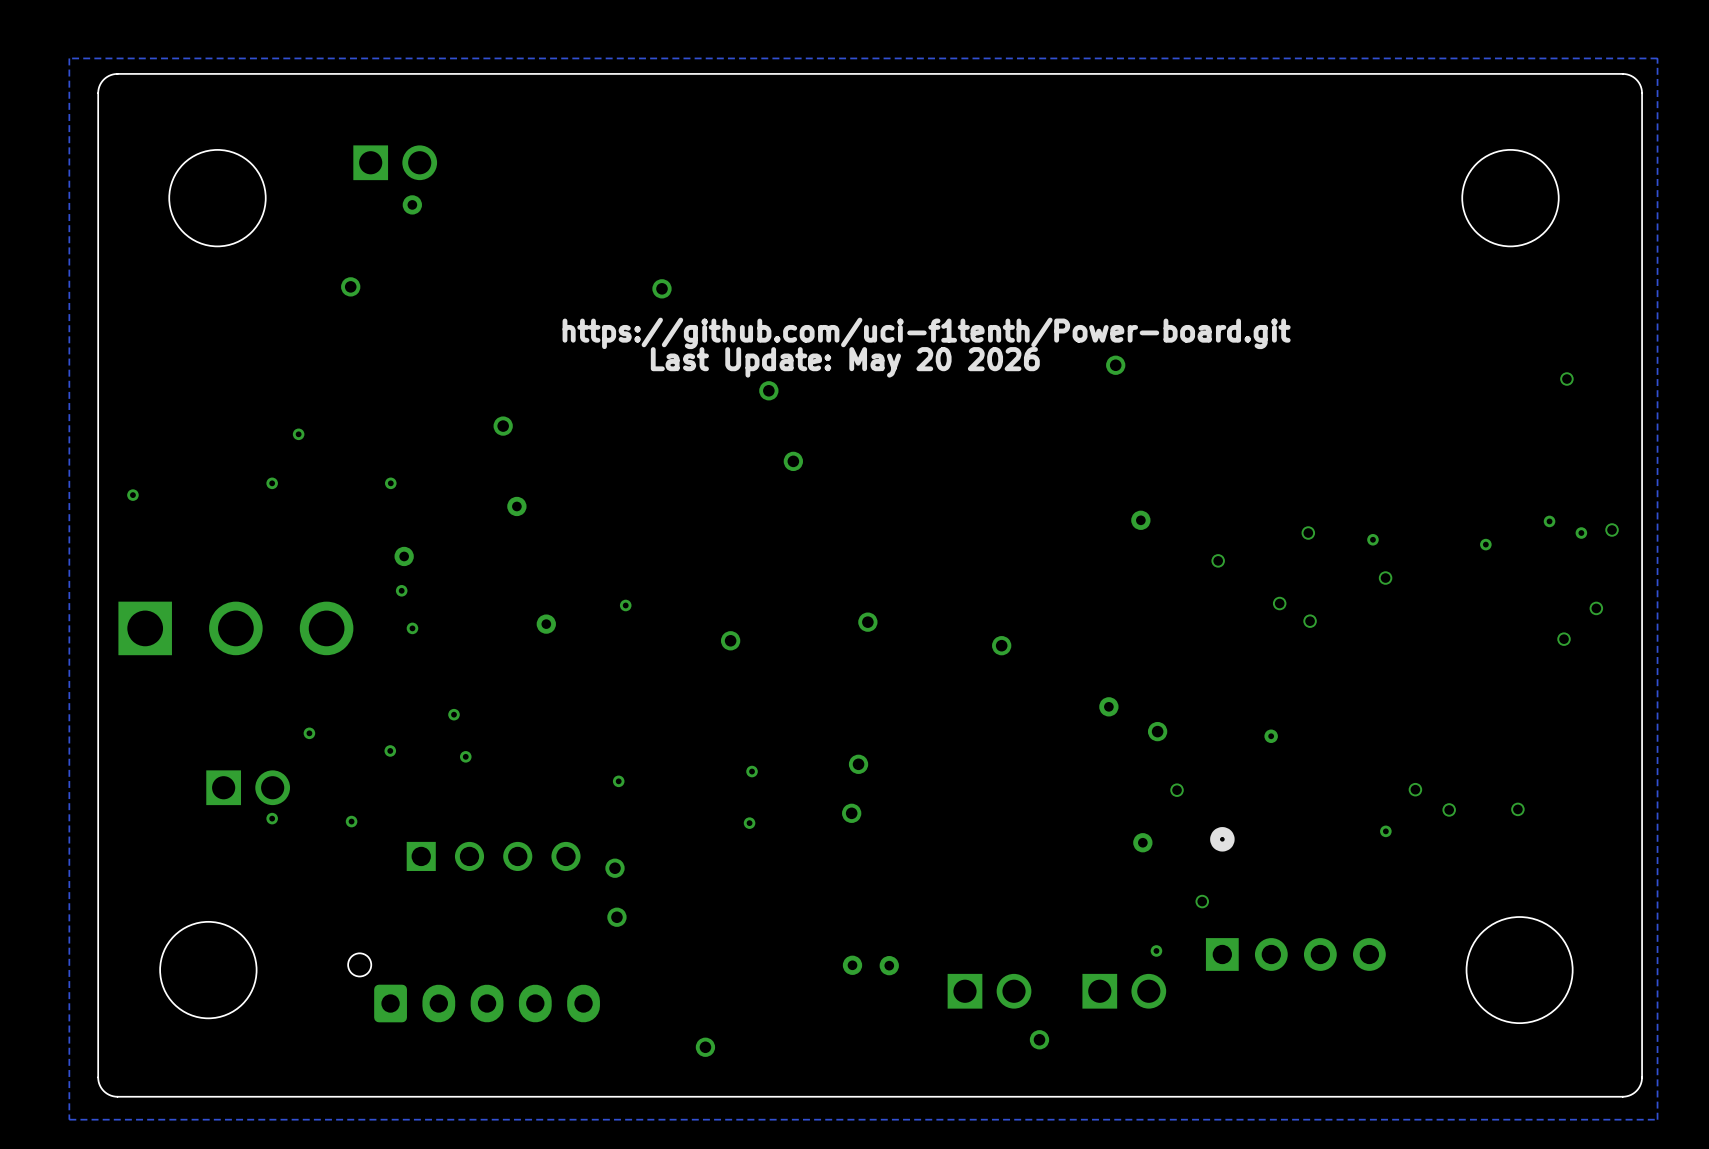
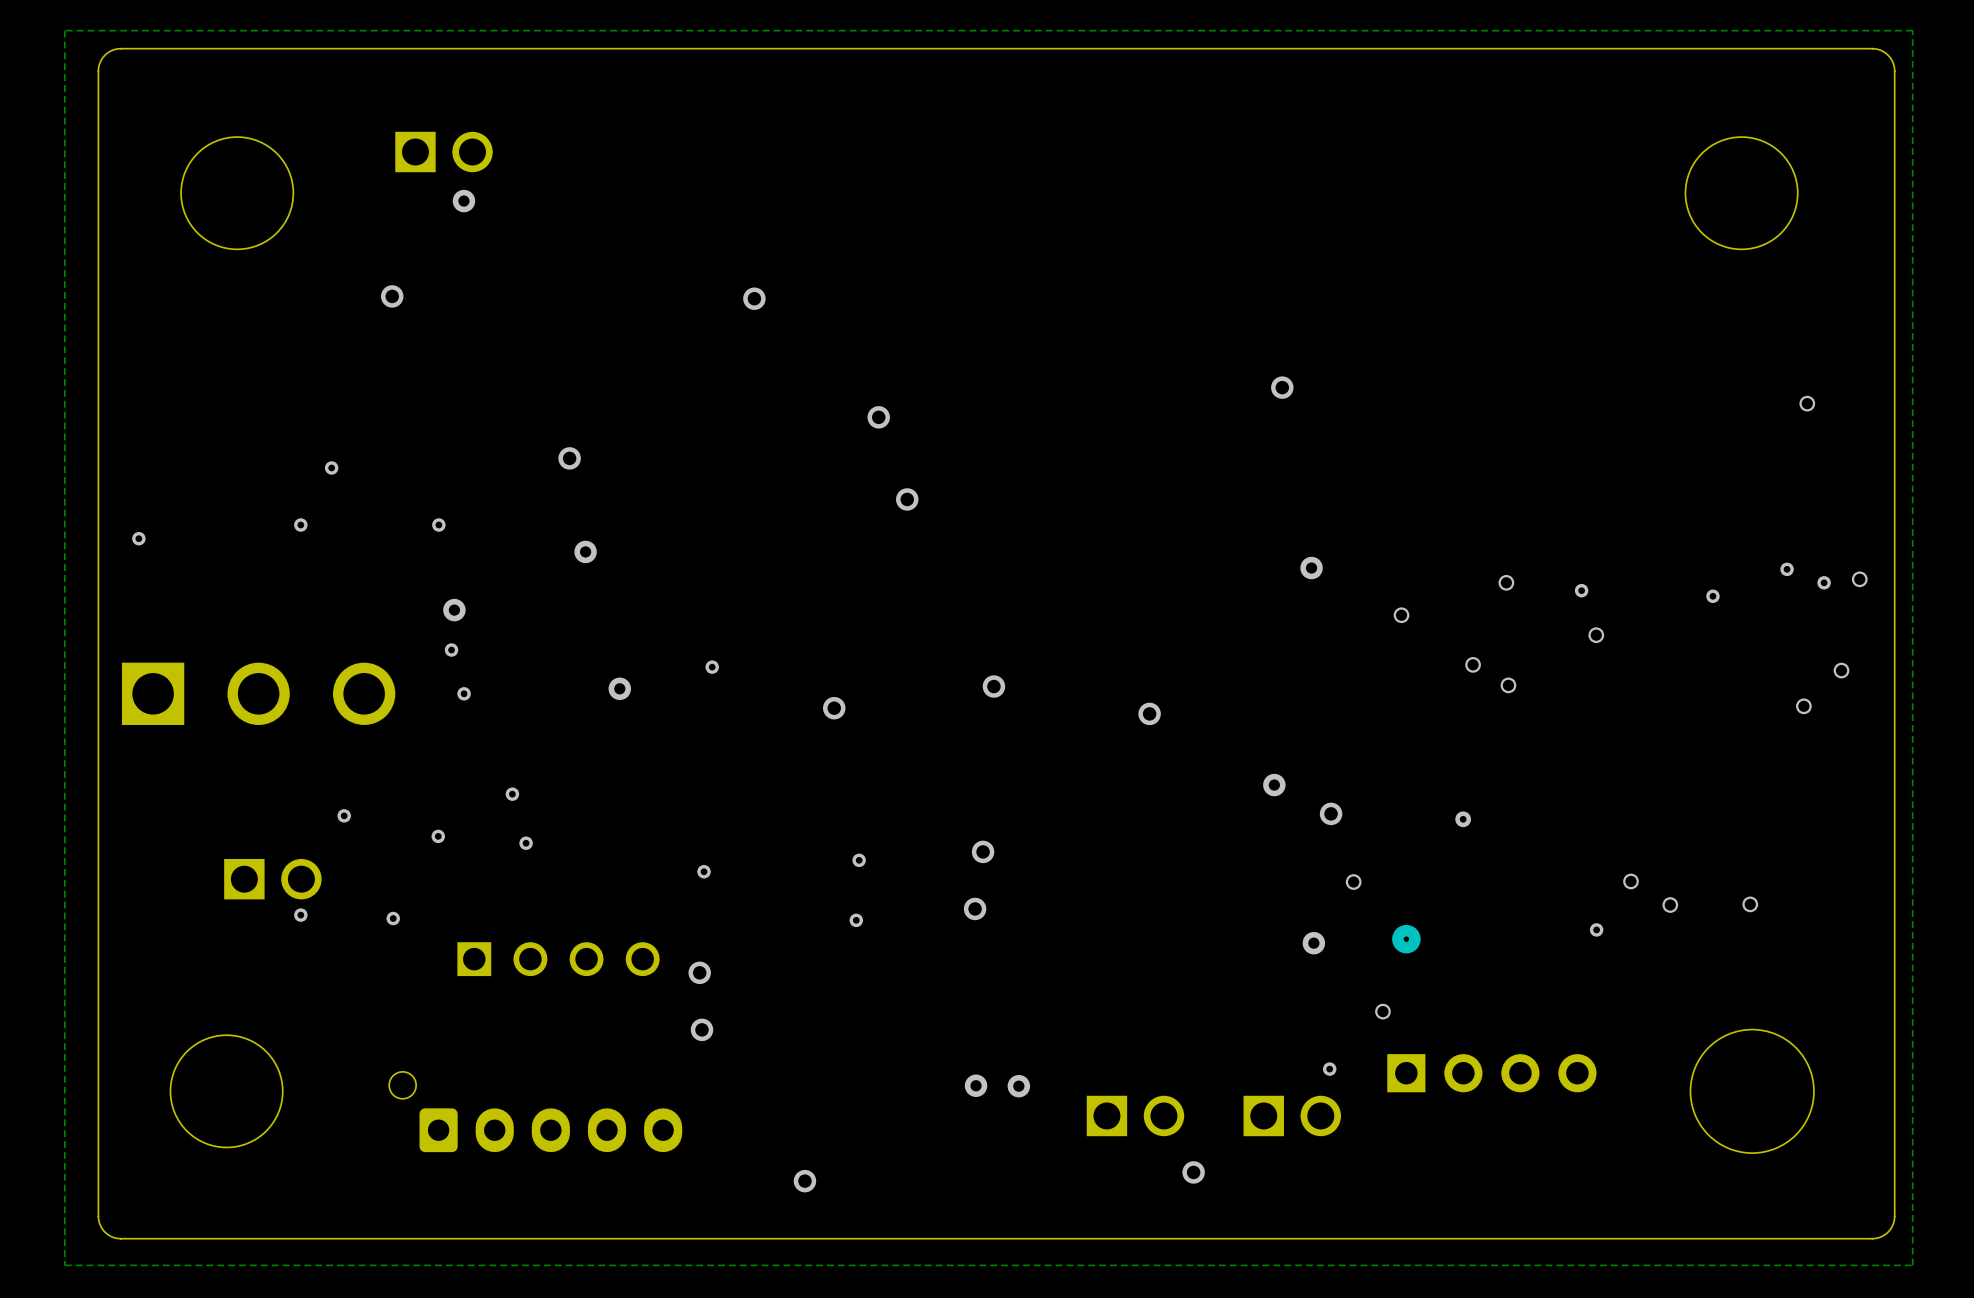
text: https://github.com/uci-f1tenth/Power-board.git (926, 333) -> none
text: Last Update: May 20 2026 (845, 362) -> none

